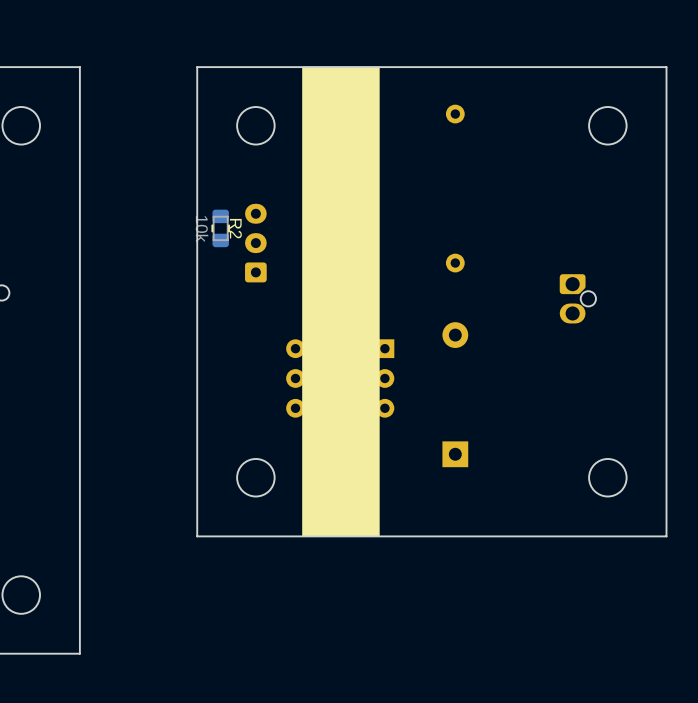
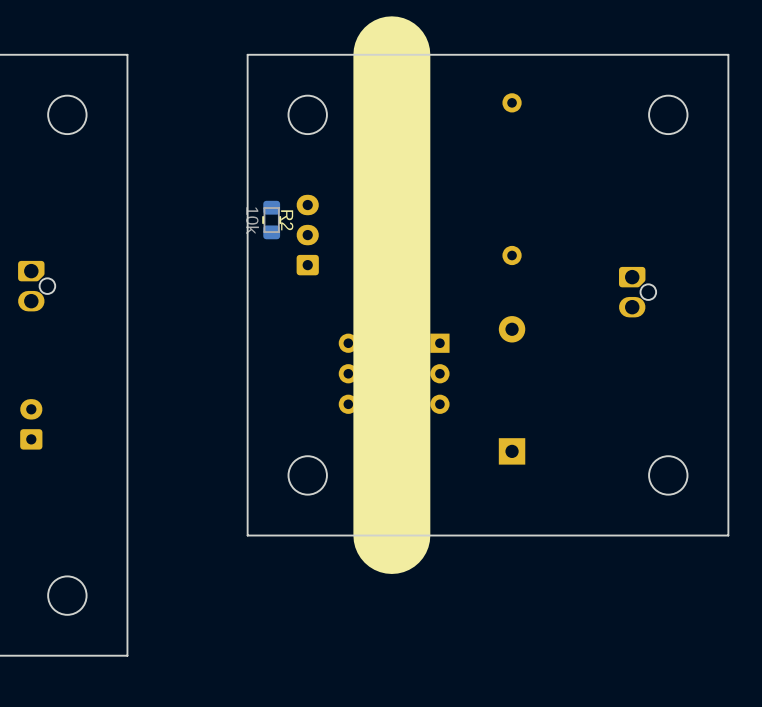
drawing: [302, 66, 380, 537] -> none
line: none -> (391, 54) (391, 535)

